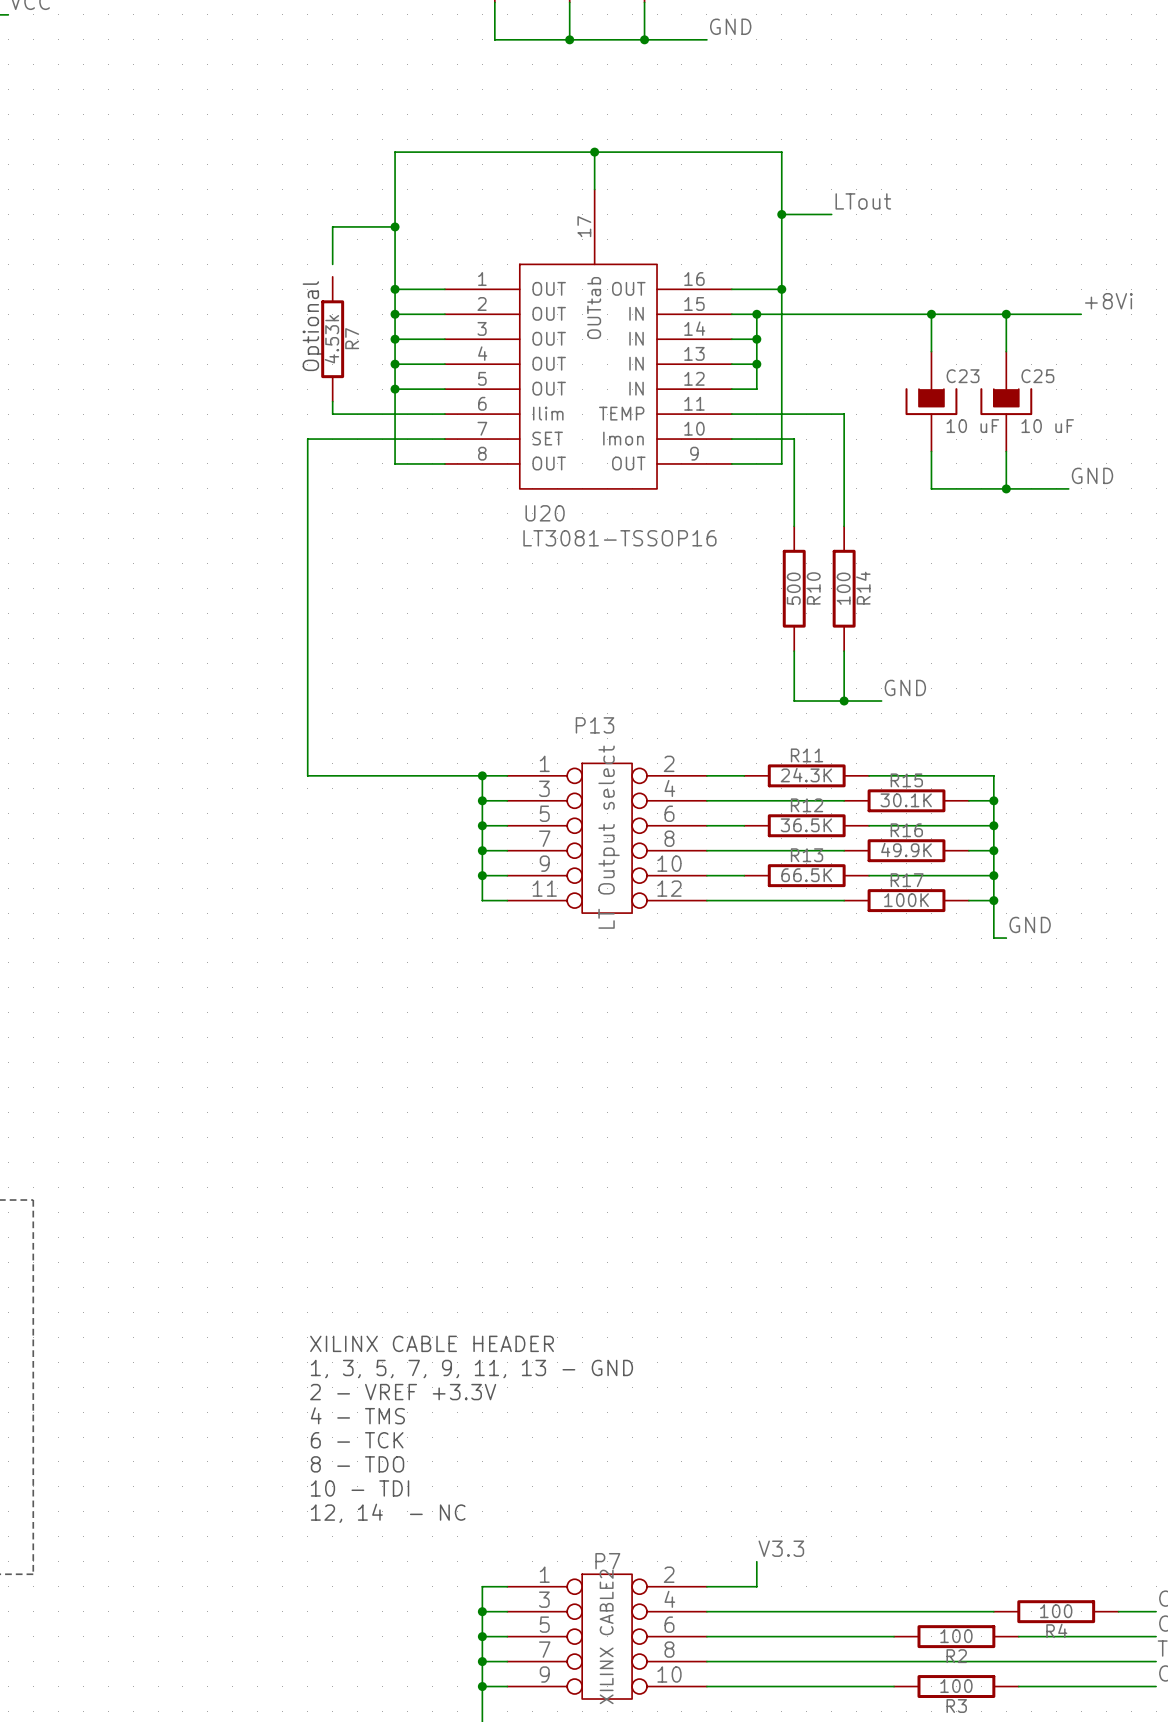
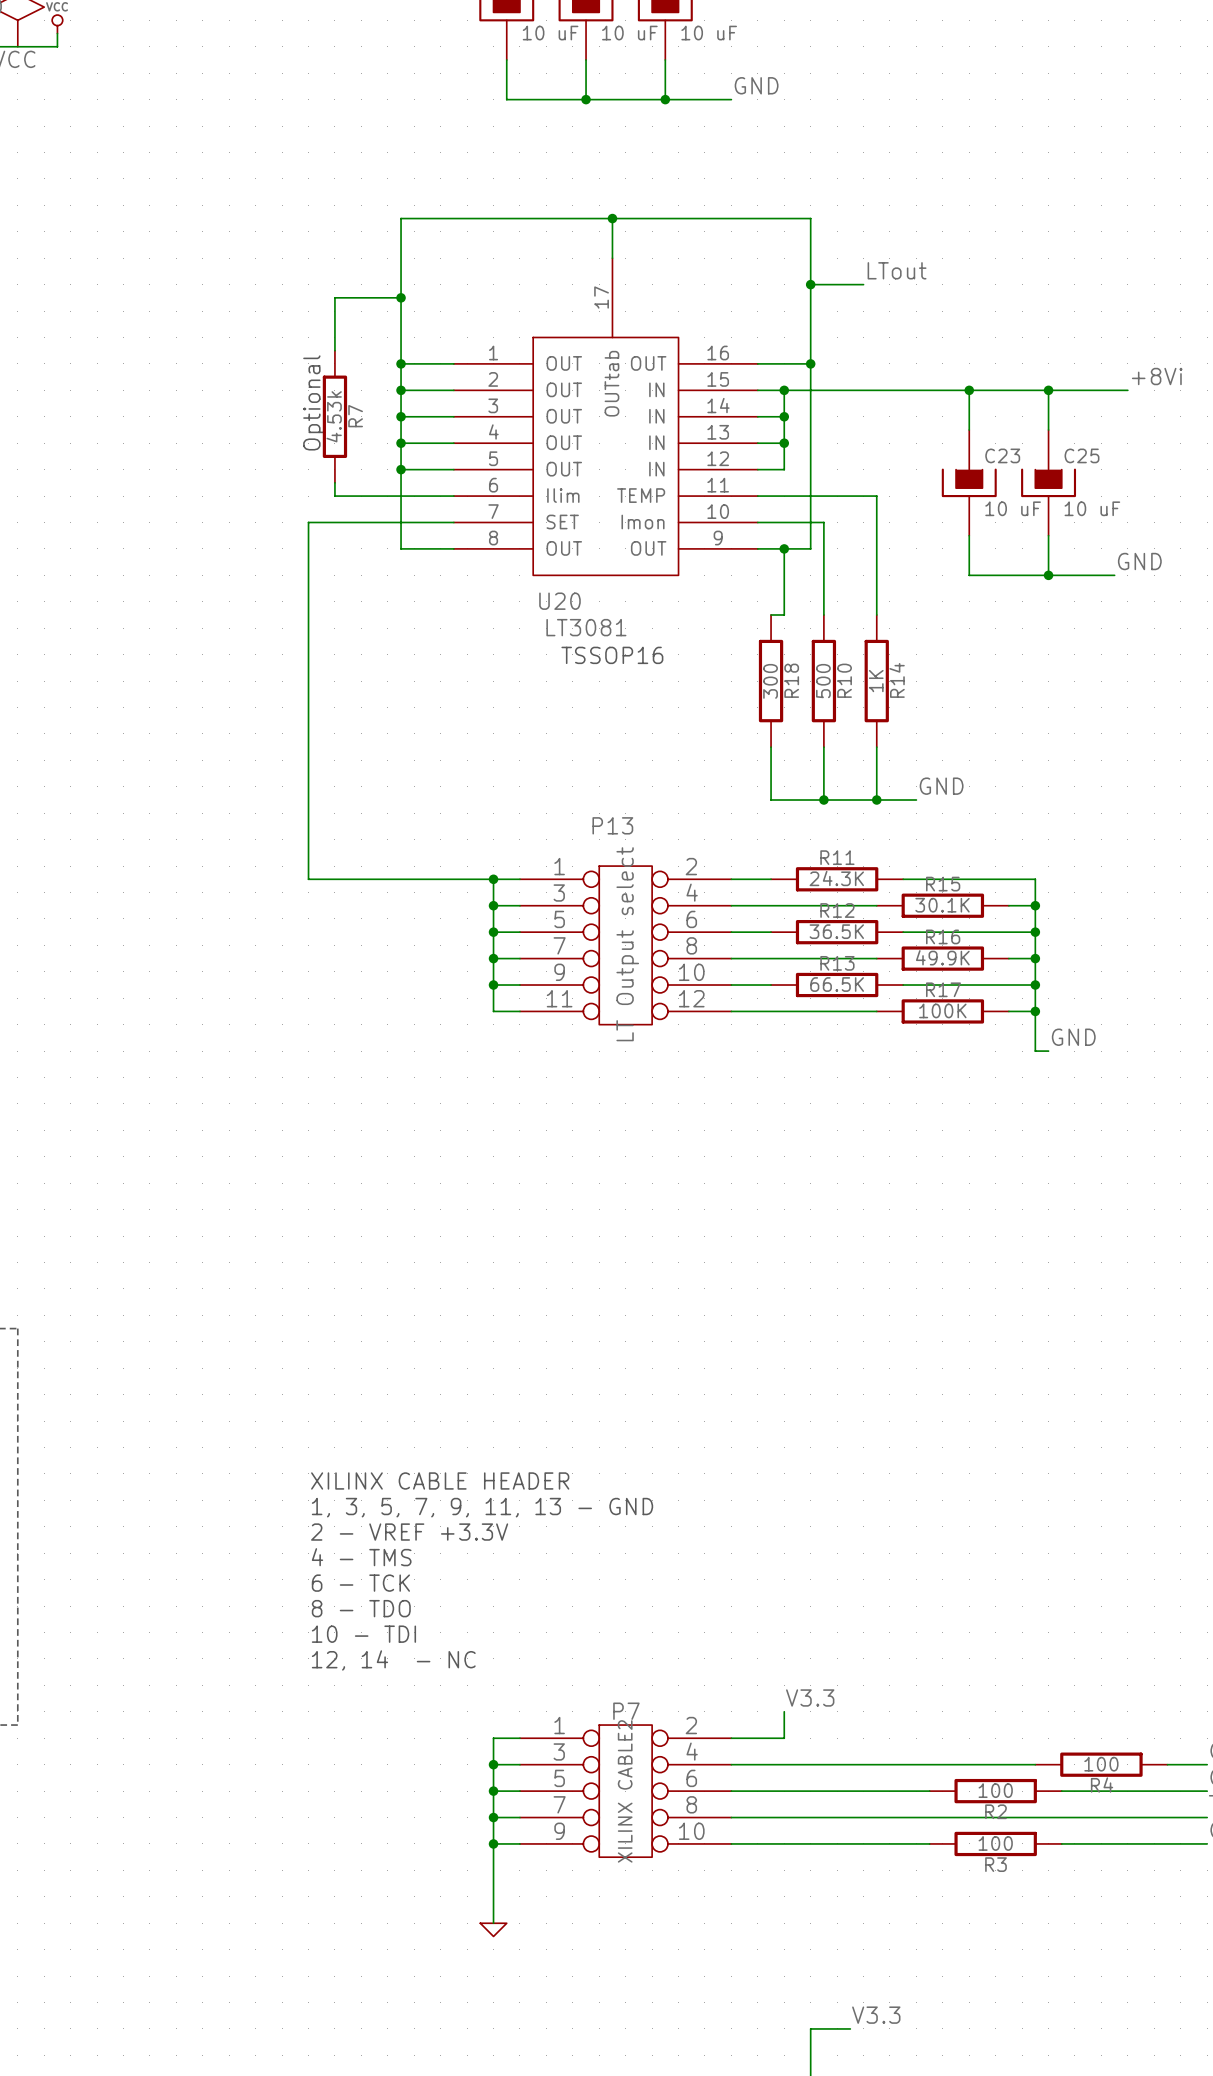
wire: none -> (334, 337) (334, 350)
wire: none -> (784, 548) (784, 614) (771, 614)
junction: none -> (784, 548)
U20 value: LT3081-TSSOP16 (619, 538) -> LT3081 (586, 627)
text: none -> TSSOP16 (612, 655)
R18: none -> 300 (771, 681)
R14 value: 100 (843, 588) -> 1K (876, 681)
wire: none -> (771, 747) (771, 800) (823, 800)
junction: none -> (823, 800)

